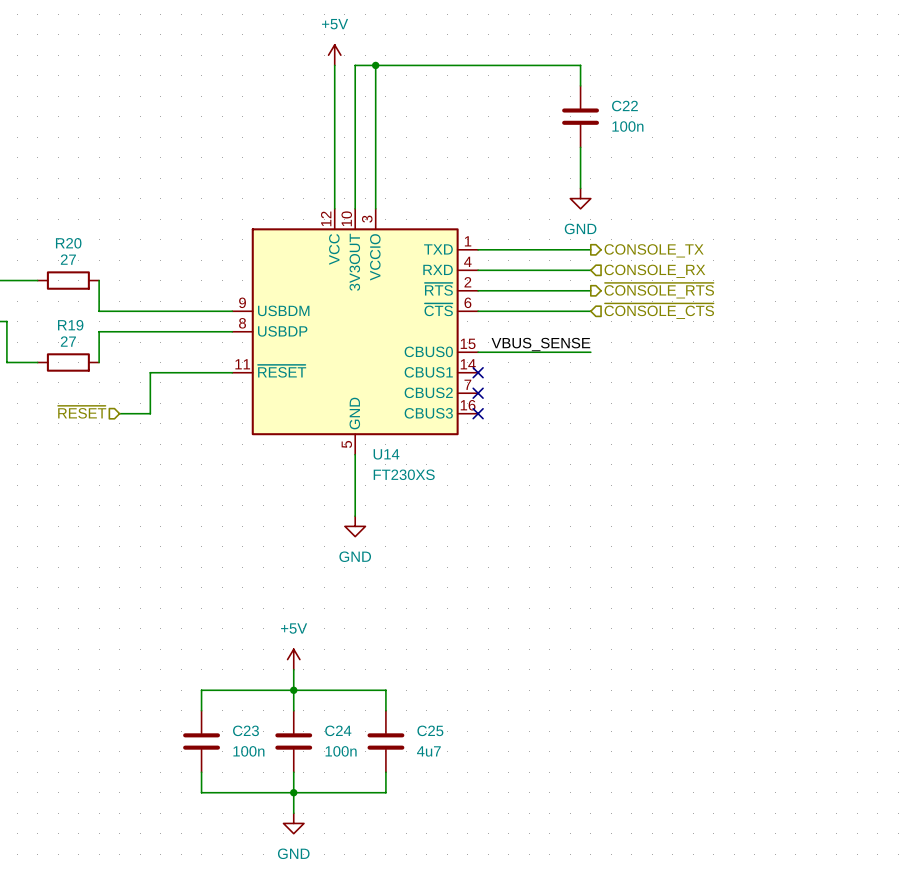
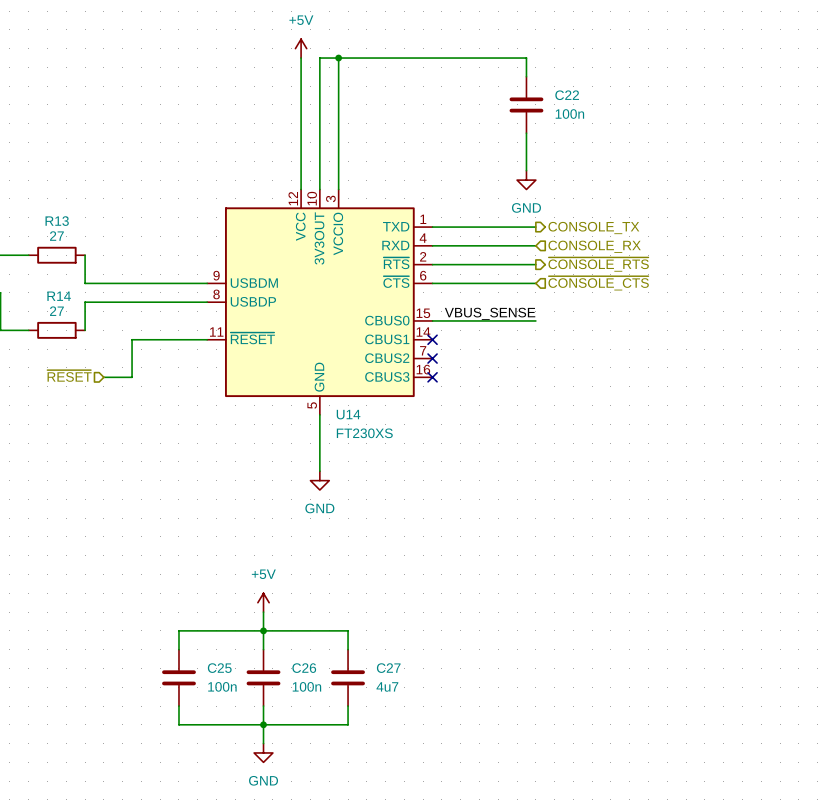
R20 name: R20 (68, 243) -> R13 (57, 221)
R19 name: R19 (70, 325) -> R14 (59, 296)
C23 name: C23 (245, 730) -> C25 (219, 668)
C24 name: C24 (338, 730) -> C26 (304, 668)
C25 name: C25 (430, 730) -> C27 (388, 668)

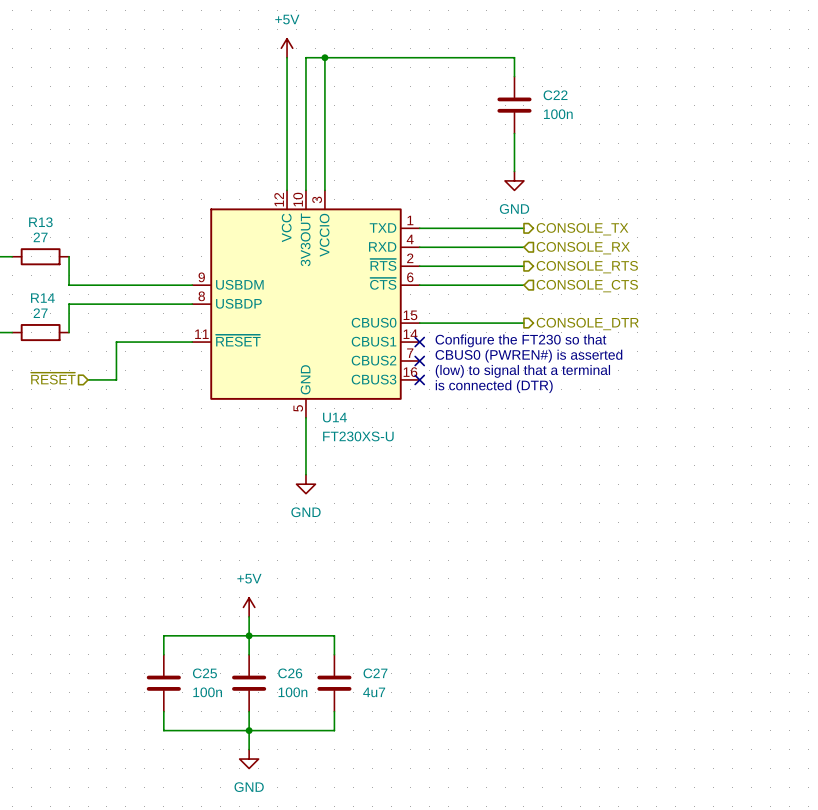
hierarchical label: ~{CONSOLE_RTS} (598, 264) -> CONSOLE_RTS (587, 267)
hierarchical label: ~{CONSOLE_CTS} (598, 283) -> CONSOLE_CTS (587, 286)
label: VBUS_SENSE (490, 313) -> none
hierarchical label: none -> CONSOLE_DTR (587, 324)
text: none -> Configure the FT230 so that (520, 340)
text: none -> CBUS0 (PWREN#) is asserted (528, 356)
text: none -> (low) to signal that a terminal (522, 371)
text: none -> is connected (DTR) (494, 386)
U14 value: FT230XS (364, 433) -> FT230XS-U (358, 436)

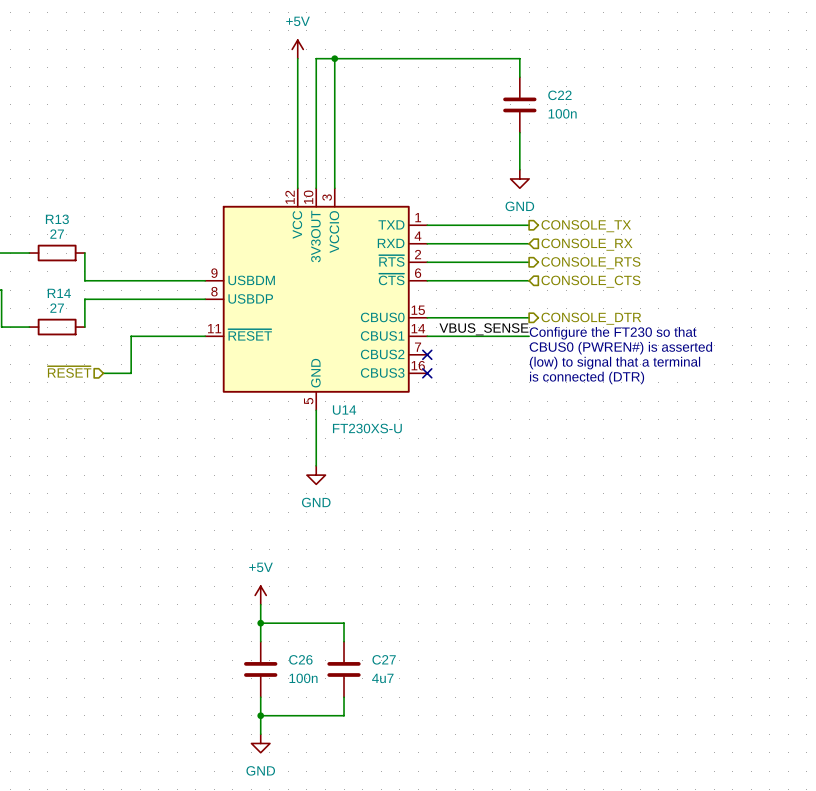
label: none -> VBUS_SENSE (483, 329)
text position: Configure the FT230 so that (520, 340) -> Configure the FT230 so that (613, 333)
wire: none -> (427, 336) (529, 336)
no-connect mark: (419, 342) -> none
text position: CBUS0 (PWREN#) is asserted (528, 356) -> CBUS0 (PWREN#) is asserted (620, 348)
text position: (low) to signal that a terminal (522, 371) -> (low) to signal that a terminal (615, 363)
text position: is connected (DTR) (494, 386) -> is connected (DTR) (587, 377)
wire: (249, 635) (163, 635) (163, 654) -> none
C25: 100n (163, 683) -> none
wire: (163, 711) (163, 730) (249, 730) -> none

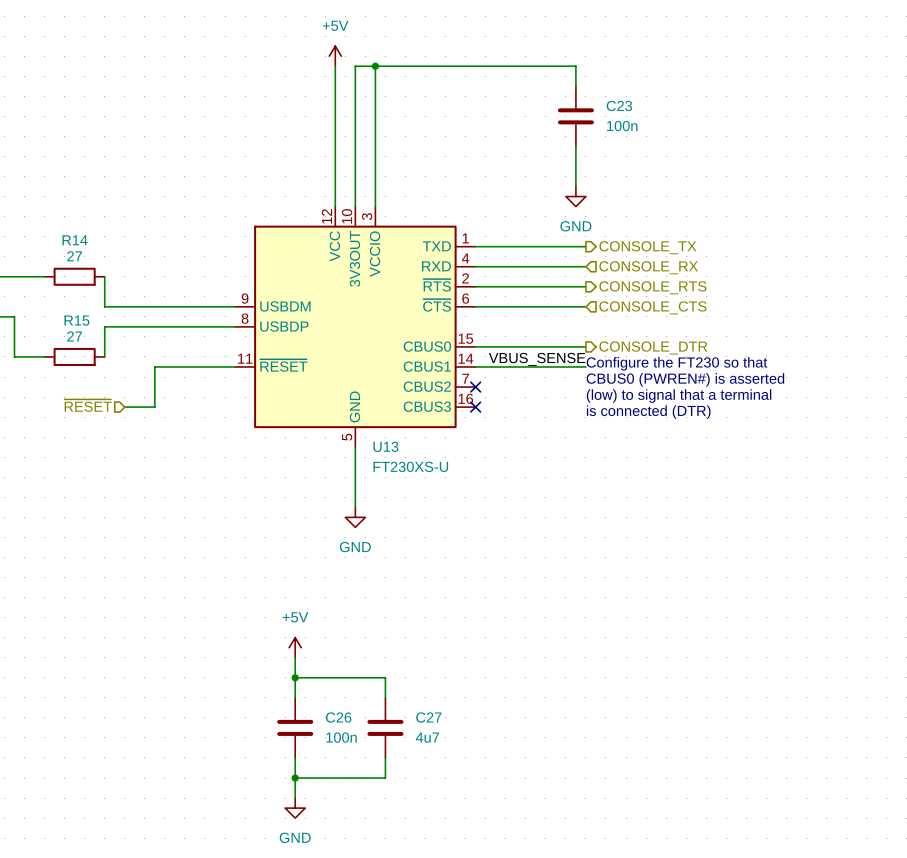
C22 name: C22 (559, 95) -> C23 (619, 105)
R13 name: R13 (57, 219) -> R14 (75, 240)
R14 name: R14 (59, 293) -> R15 (76, 320)
U14 name: U14 (344, 410) -> U13 (385, 446)

